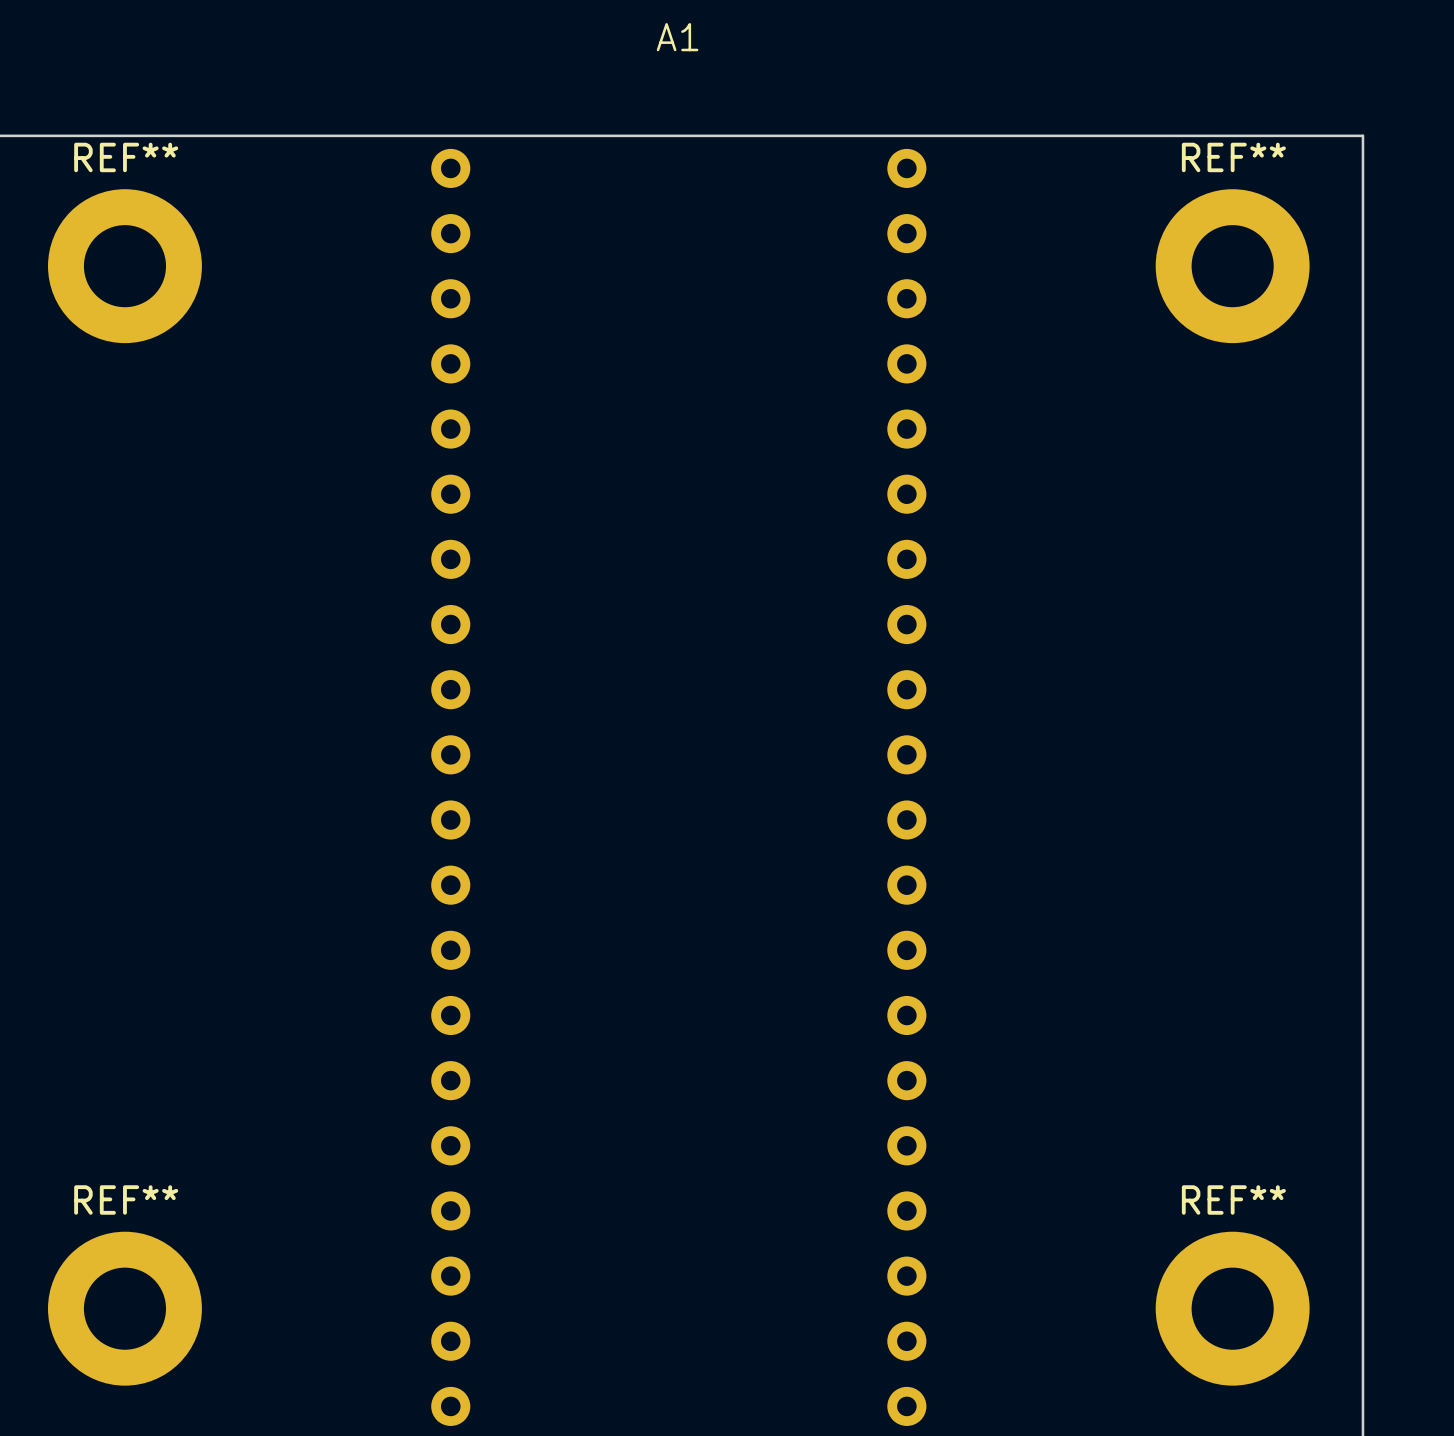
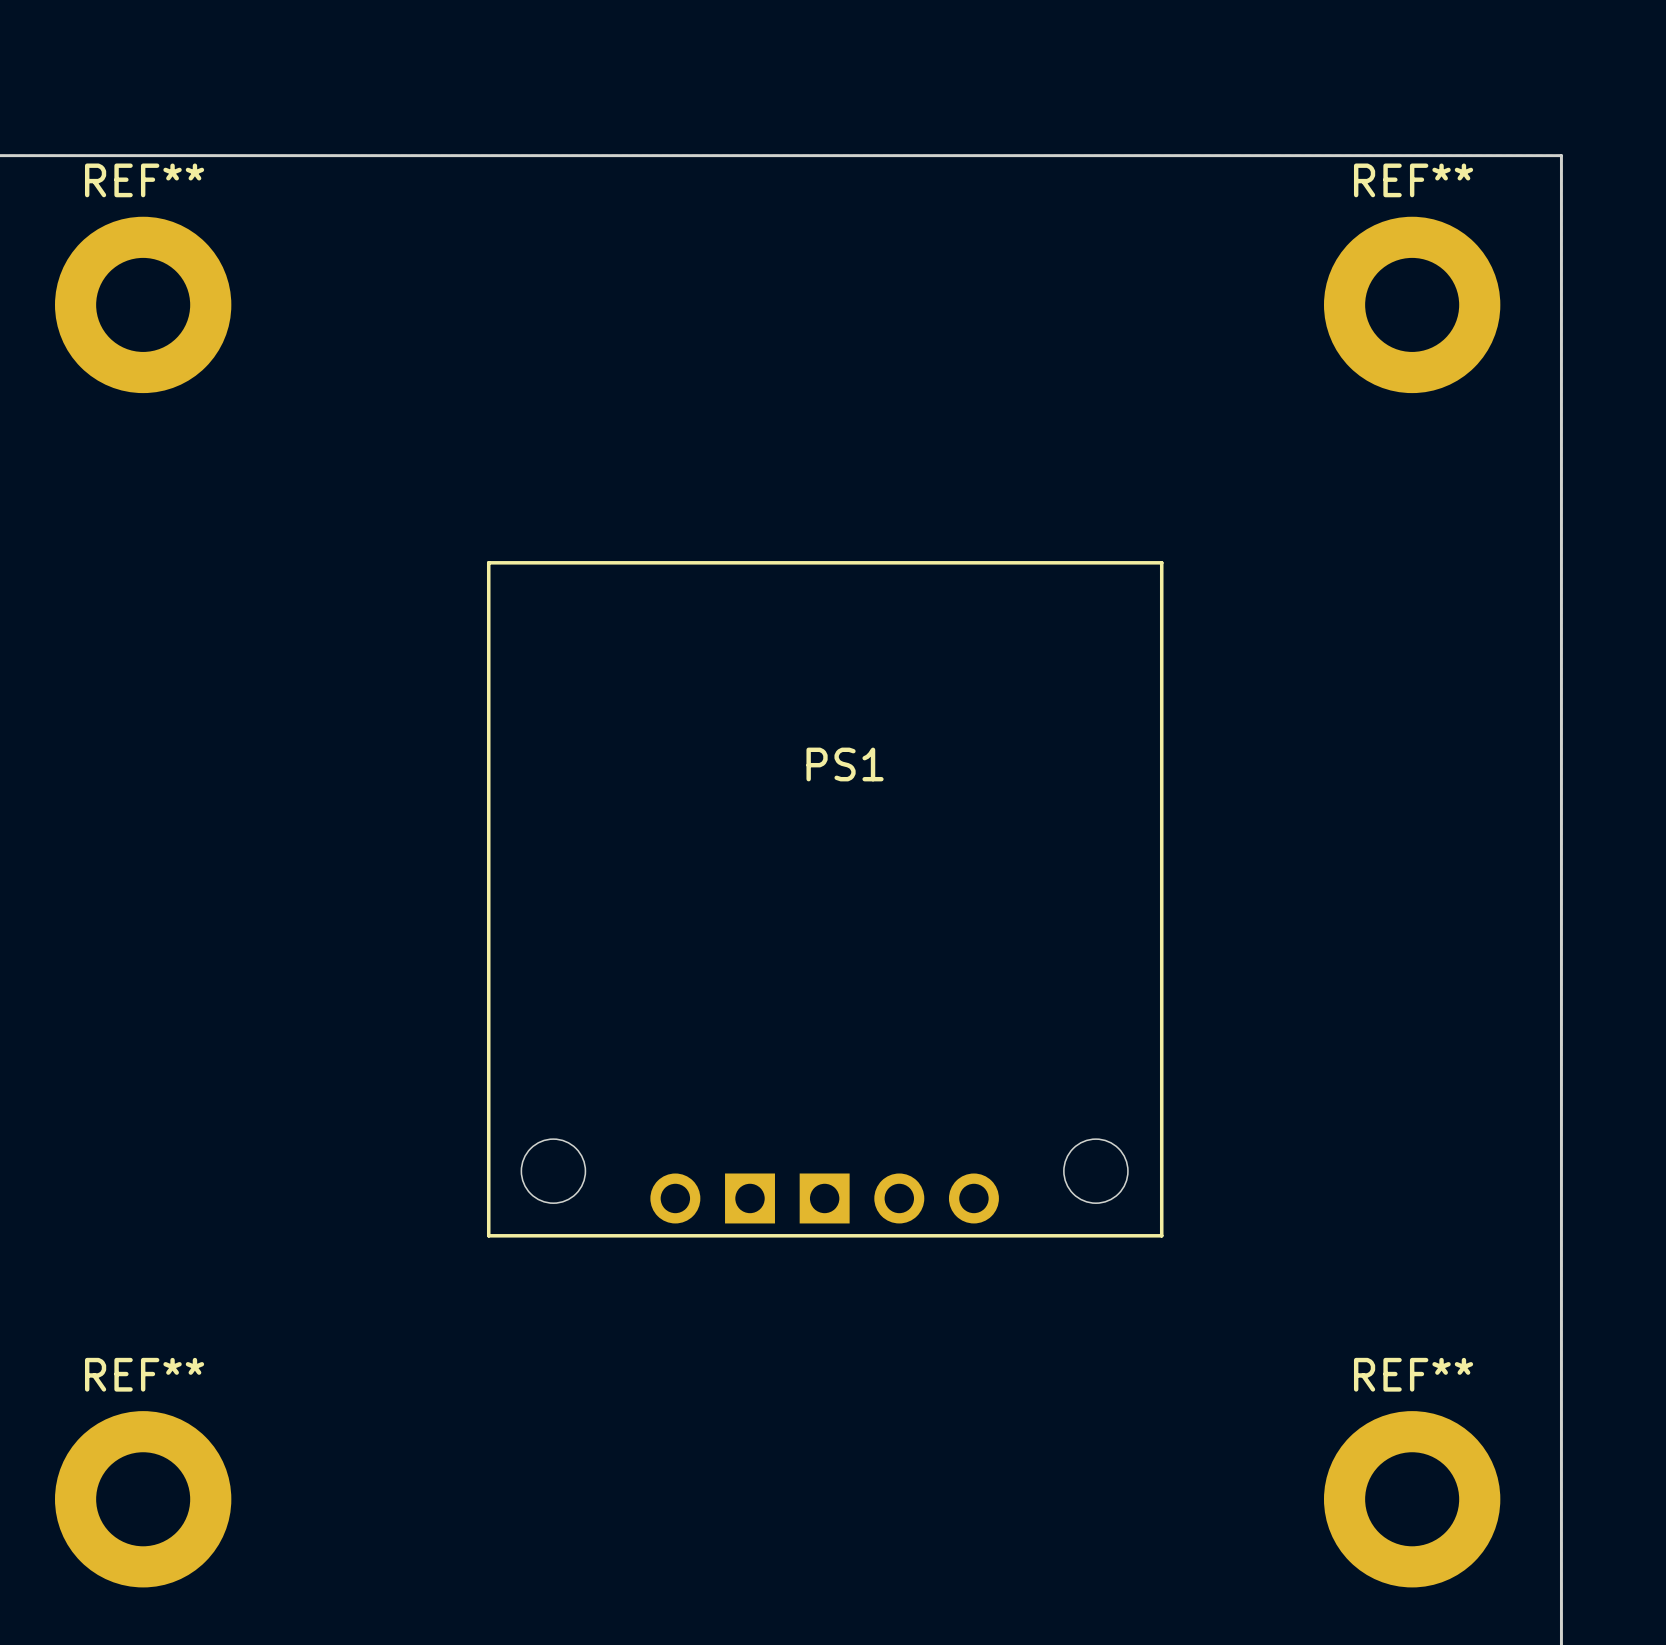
PS1: none -> (825, 899)
A1: (678, 787) -> none

